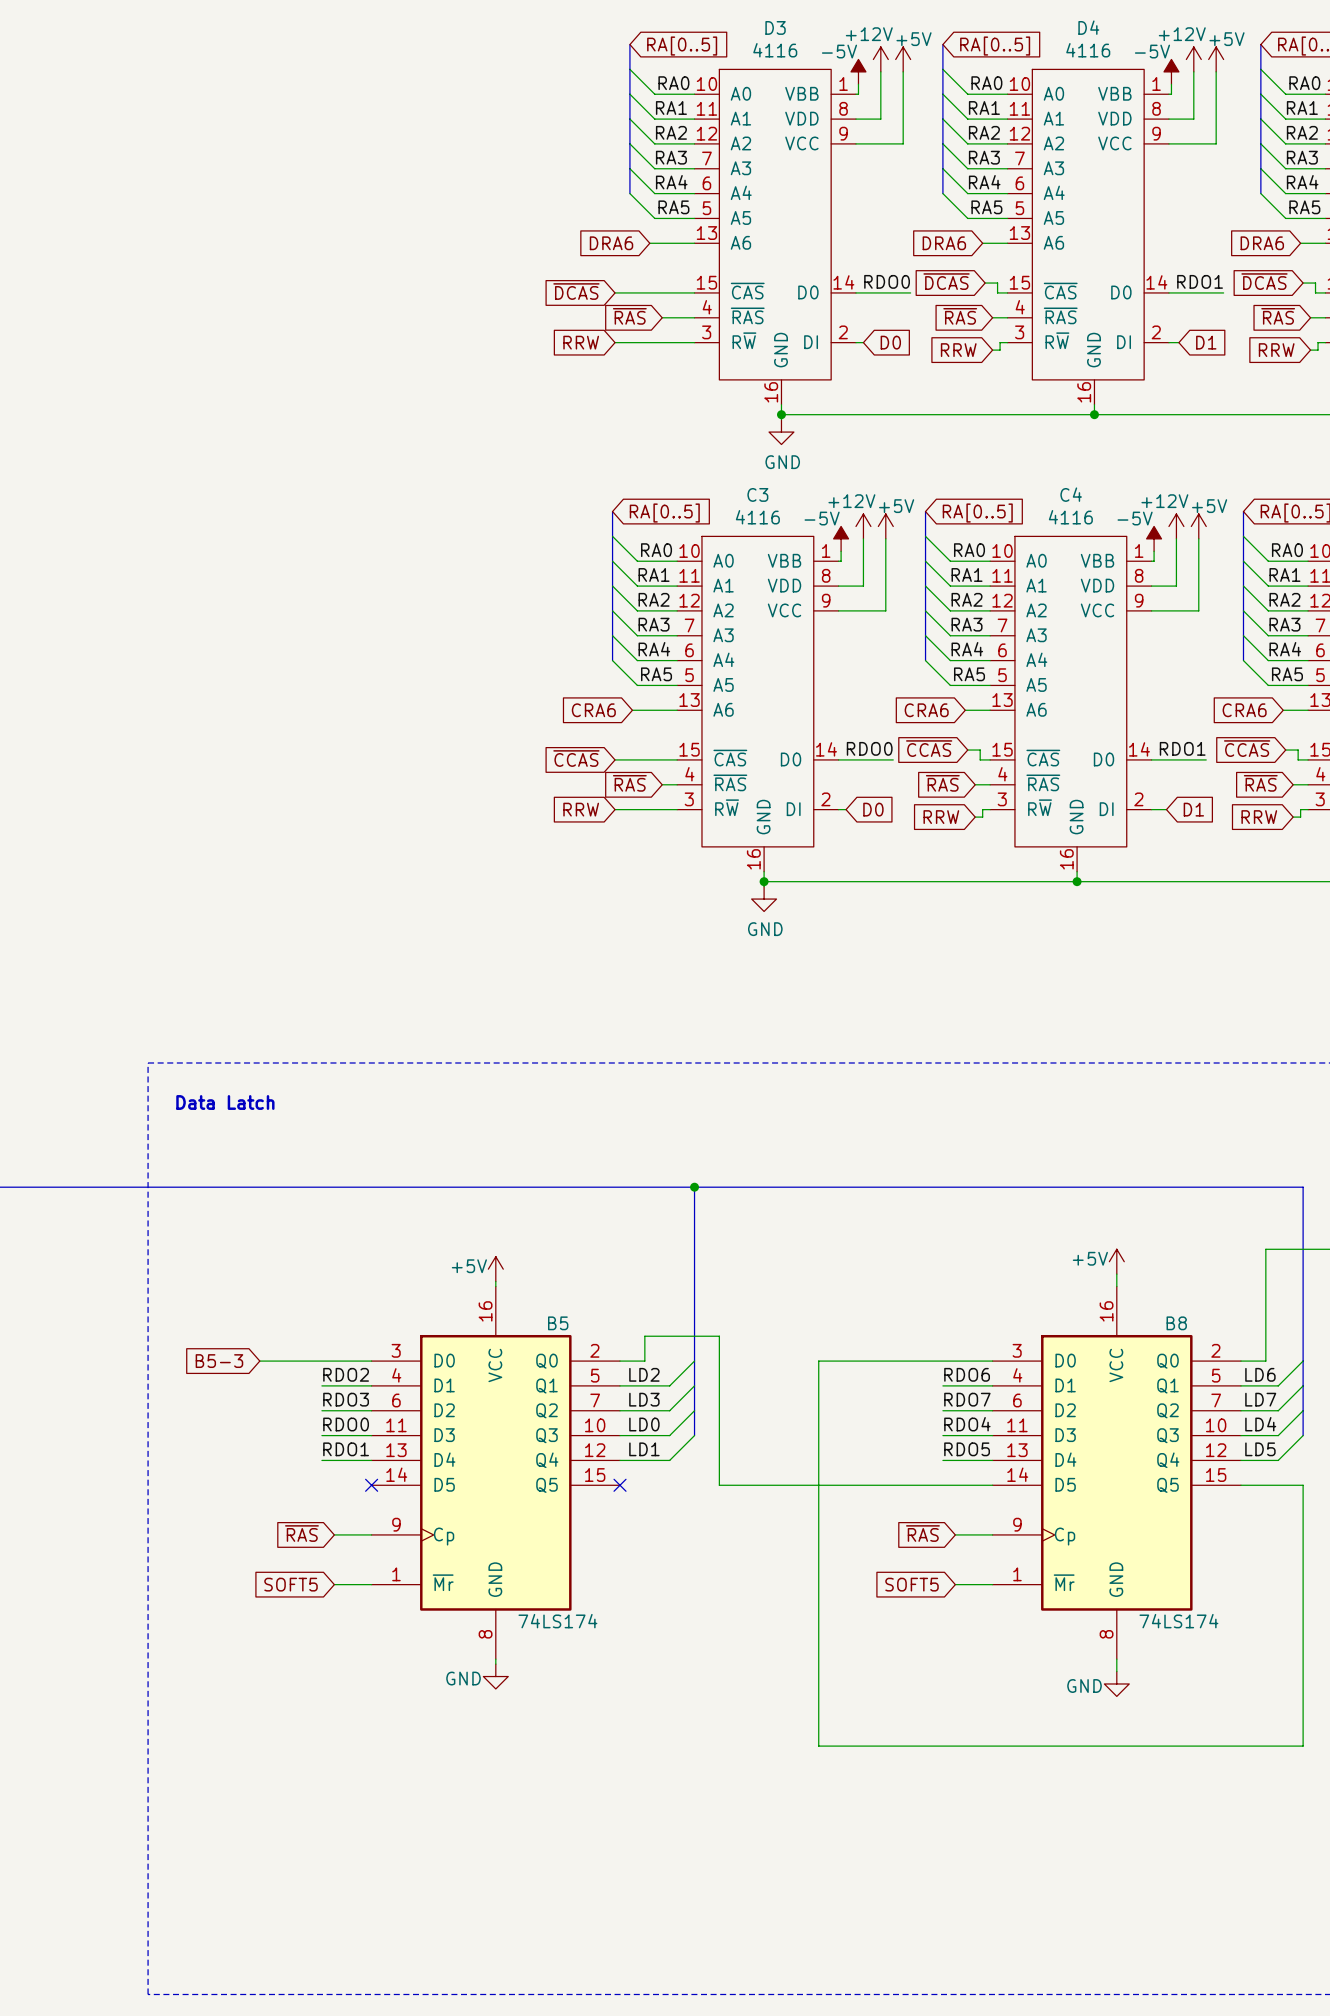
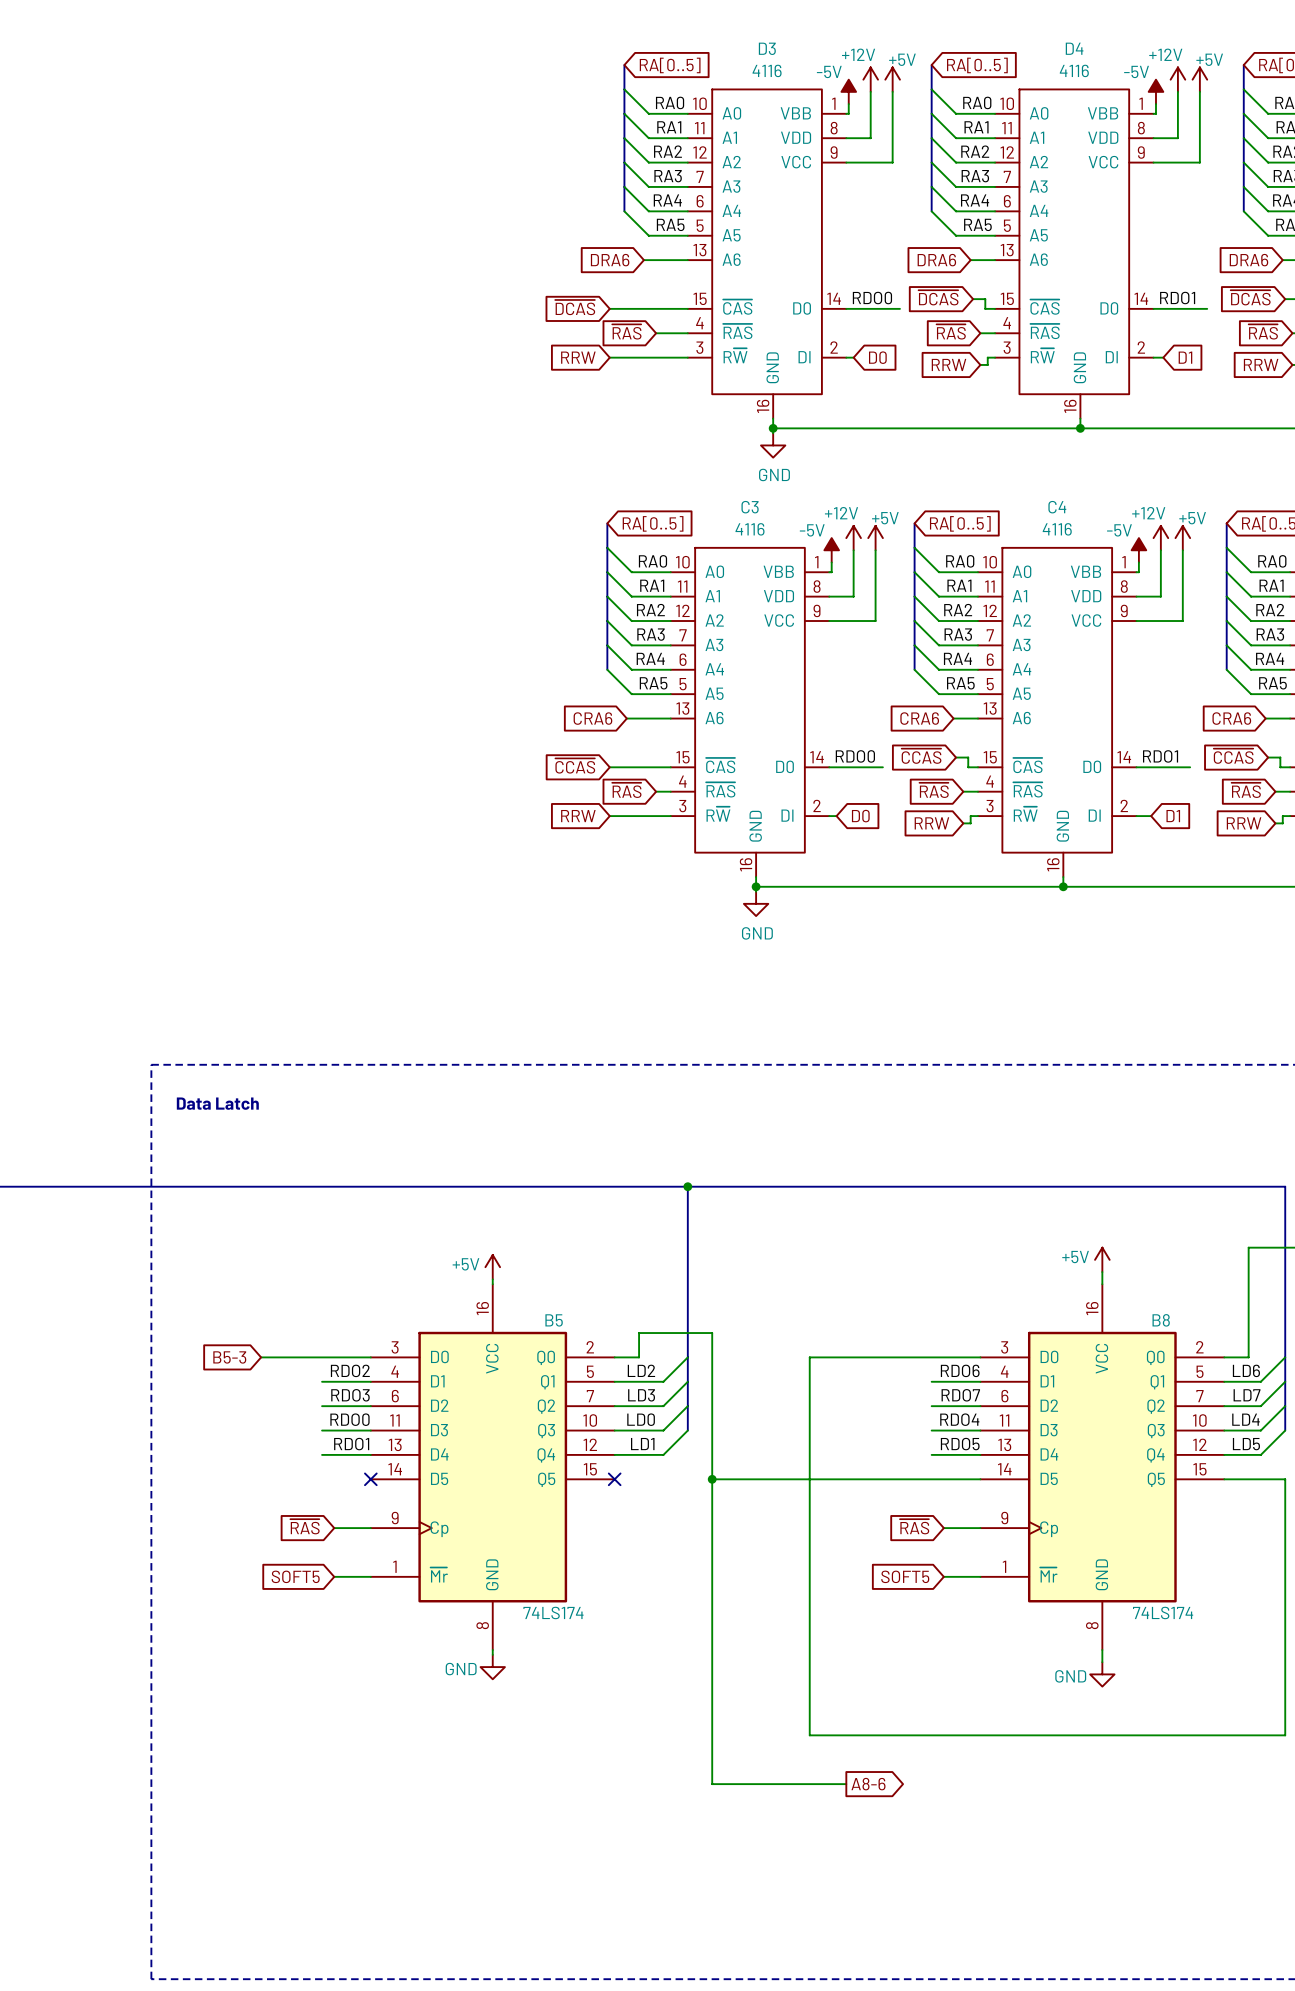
wire: none -> (712, 1479) (712, 1784) (846, 1784)
junction: none -> (712, 1479)
global label: none -> A8-6 (868, 1784)

